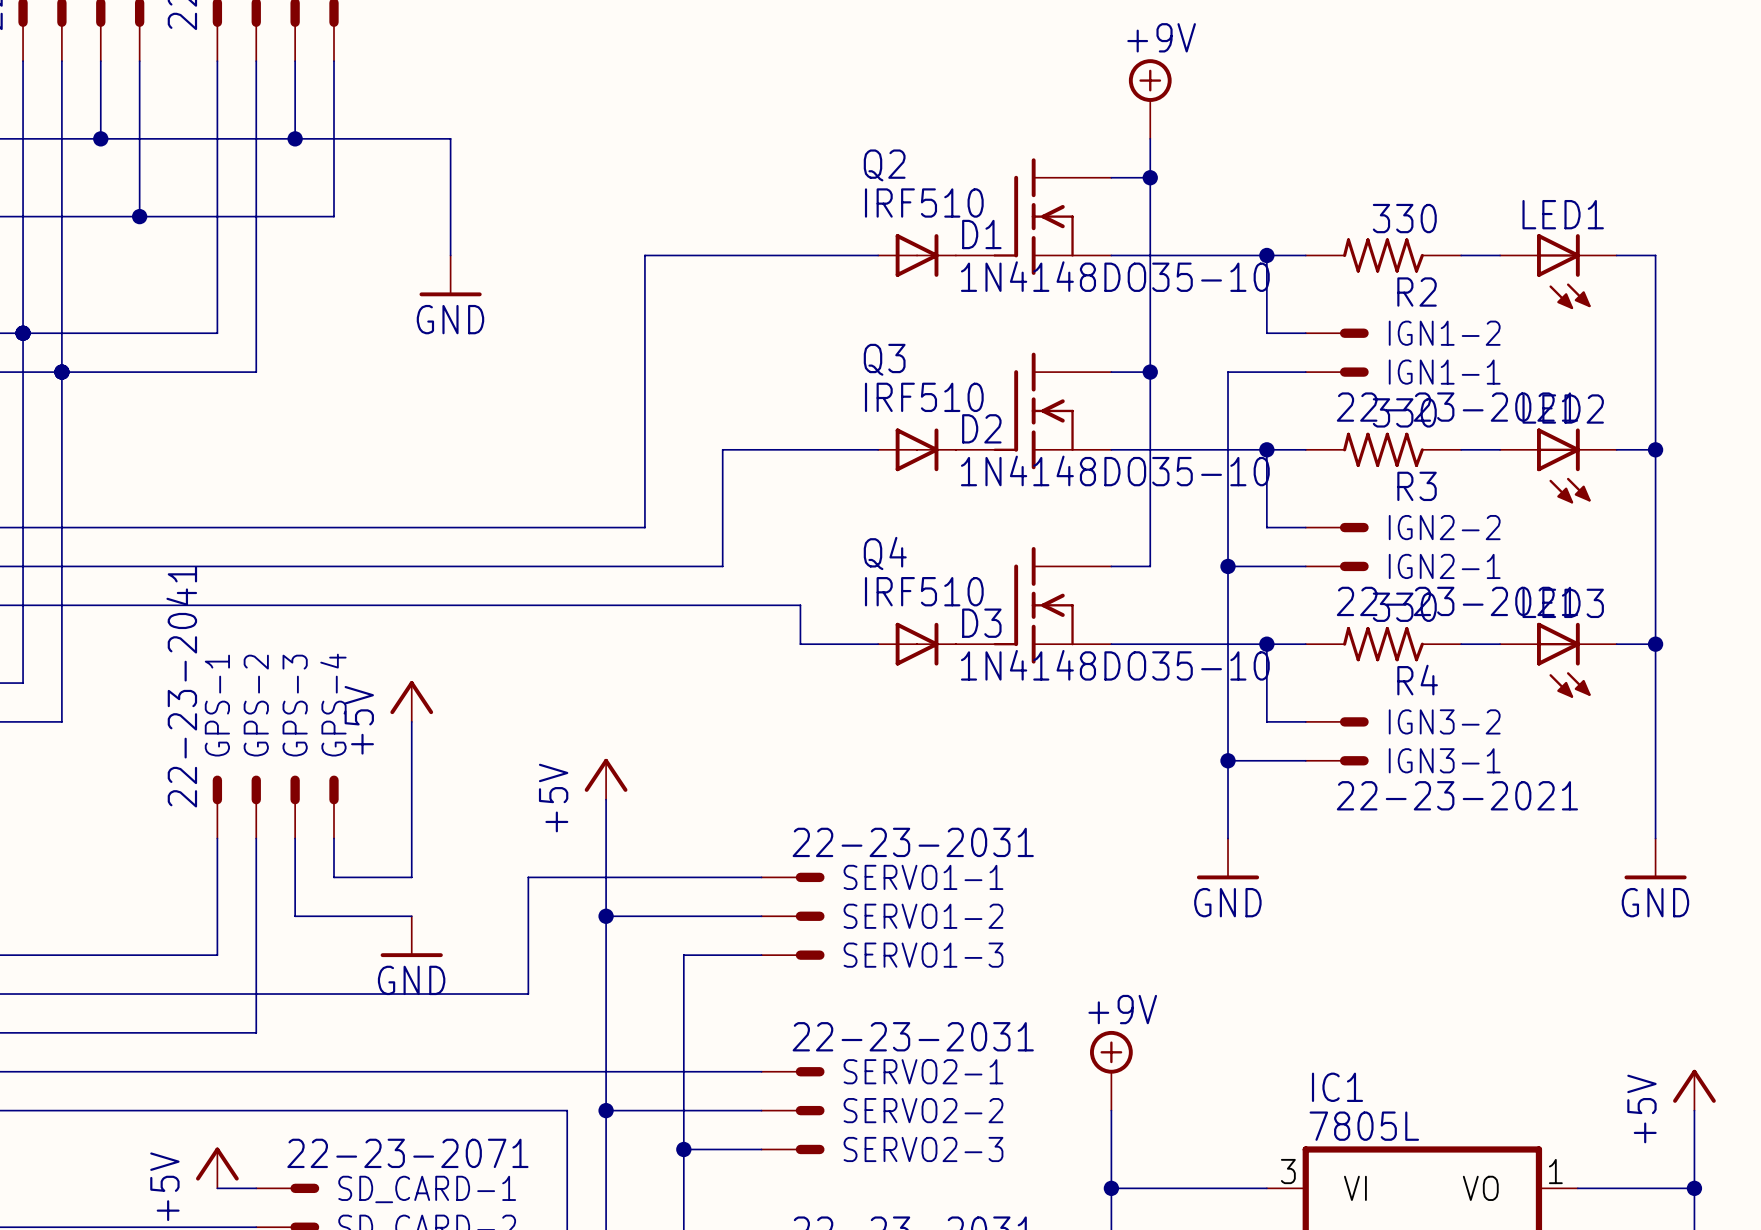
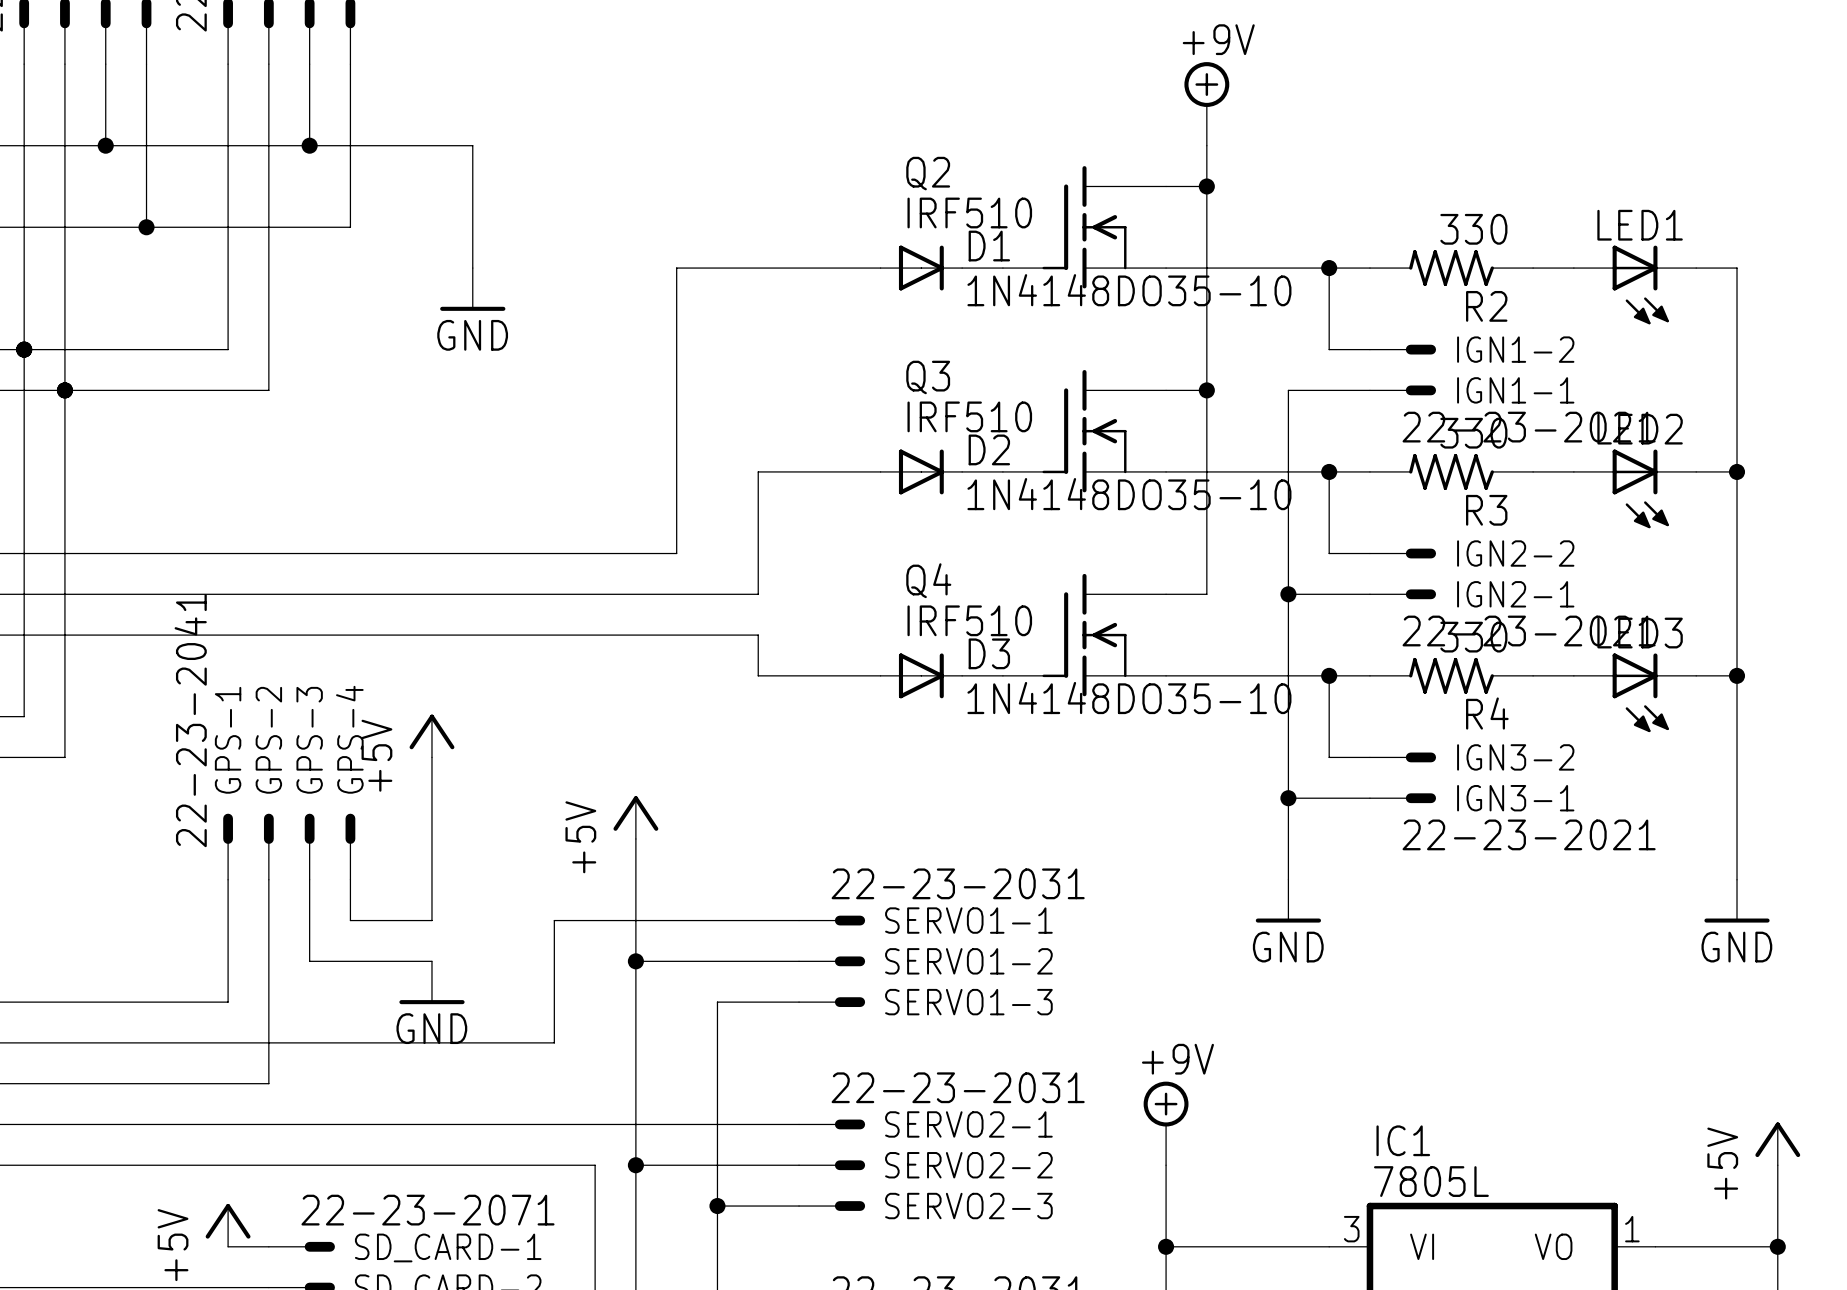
D1 position: (917, 255) -> (921, 268)
D2 position: (917, 449) -> (921, 471)
wire: (722, 605) (800, 605) (800, 644) -> (758, 635) (758, 675) (839, 675)
D3 position: (917, 644) -> (921, 675)

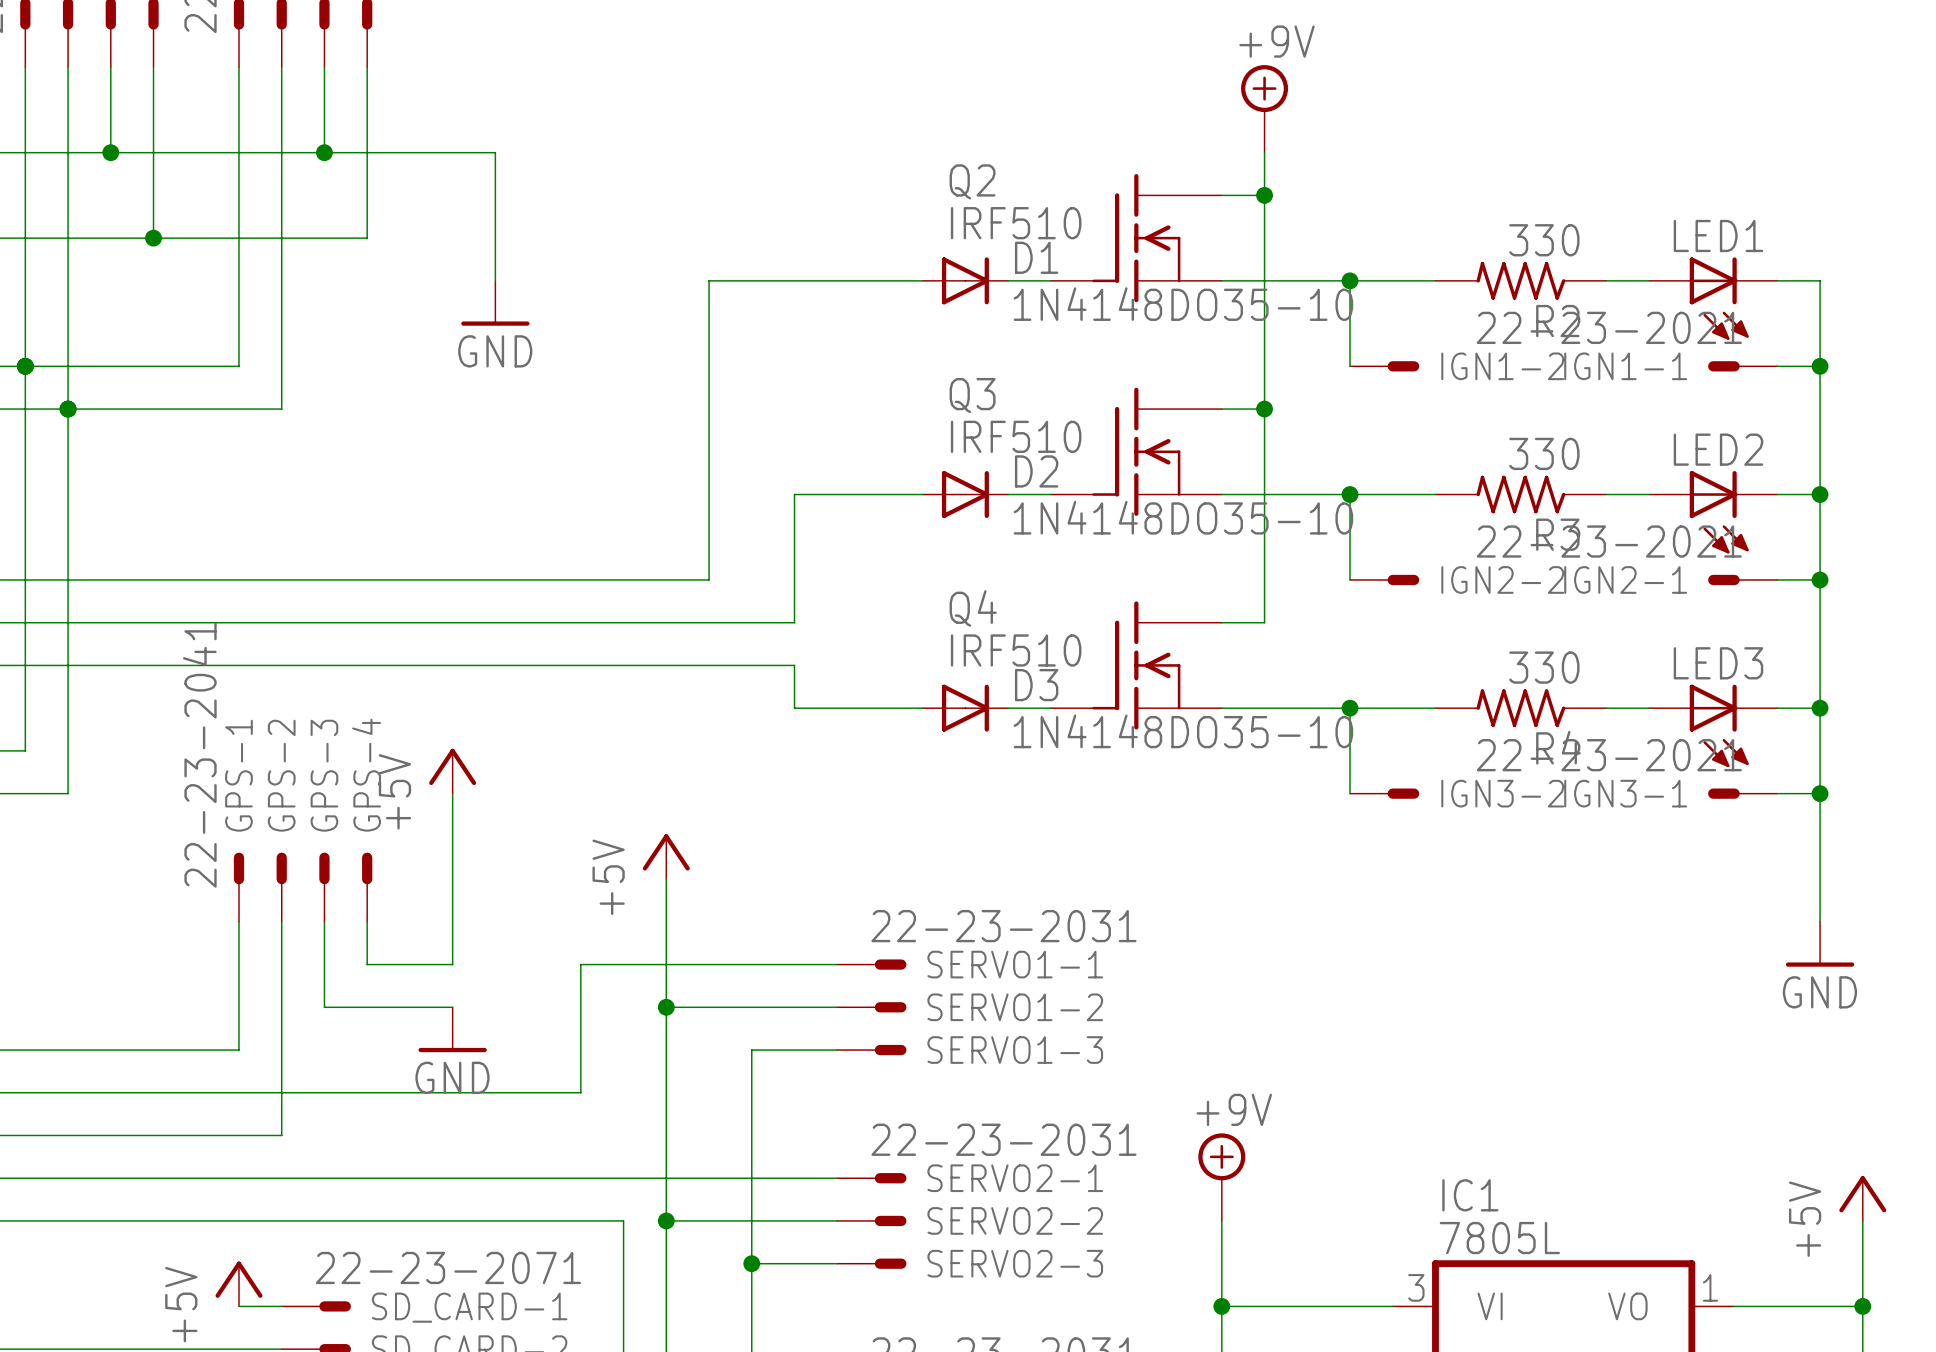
wire: none -> (1350, 280) (1350, 366)
wire: (1329, 268) (1329, 349) (1369, 349) -> none
junction position: (1329, 268) -> (1350, 280)
IGN1-2 position: (1403, 349) -> (1384, 366)
wire: none -> (1777, 366) (1820, 366)
junction: none -> (1820, 366)
wire: (1369, 390) (1288, 390) (1288, 471) -> none
IGN1-1 position: (1403, 390) -> (1742, 366)
IGN1-1 rotation: 0° (1420, 390) -> 180° (1723, 366)
wire: (1329, 471) (1329, 553) (1369, 553) -> none
junction position: (1329, 471) -> (1350, 494)
wire: (1288, 553) (1288, 675) -> none
IGN2-2 position: (1403, 553) -> (1384, 579)
wire: none -> (1777, 579) (1820, 579)
junction: none -> (1820, 579)
wire: (1288, 594) (1369, 594) -> none
junction: (1288, 594) -> none
IGN2-1 position: (1403, 594) -> (1742, 579)
IGN2-1 rotation: 0° (1420, 594) -> 180° (1723, 579)
junction: none -> (1350, 708)
wire: (1329, 675) (1329, 757) (1369, 757) -> none
junction: (1329, 675) -> none
wire: (1288, 757) (1288, 879) -> none
IGN3-2 position: (1403, 757) -> (1384, 793)
wire: none -> (1777, 793) (1820, 793)
junction: none -> (1820, 793)
wire: (1288, 798) (1369, 798) -> none
junction: (1288, 798) -> none
IGN3-1 position: (1403, 798) -> (1742, 793)
IGN3-1 rotation: 0° (1420, 798) -> 180° (1723, 793)
power symbol: GND (1288, 901) -> none

